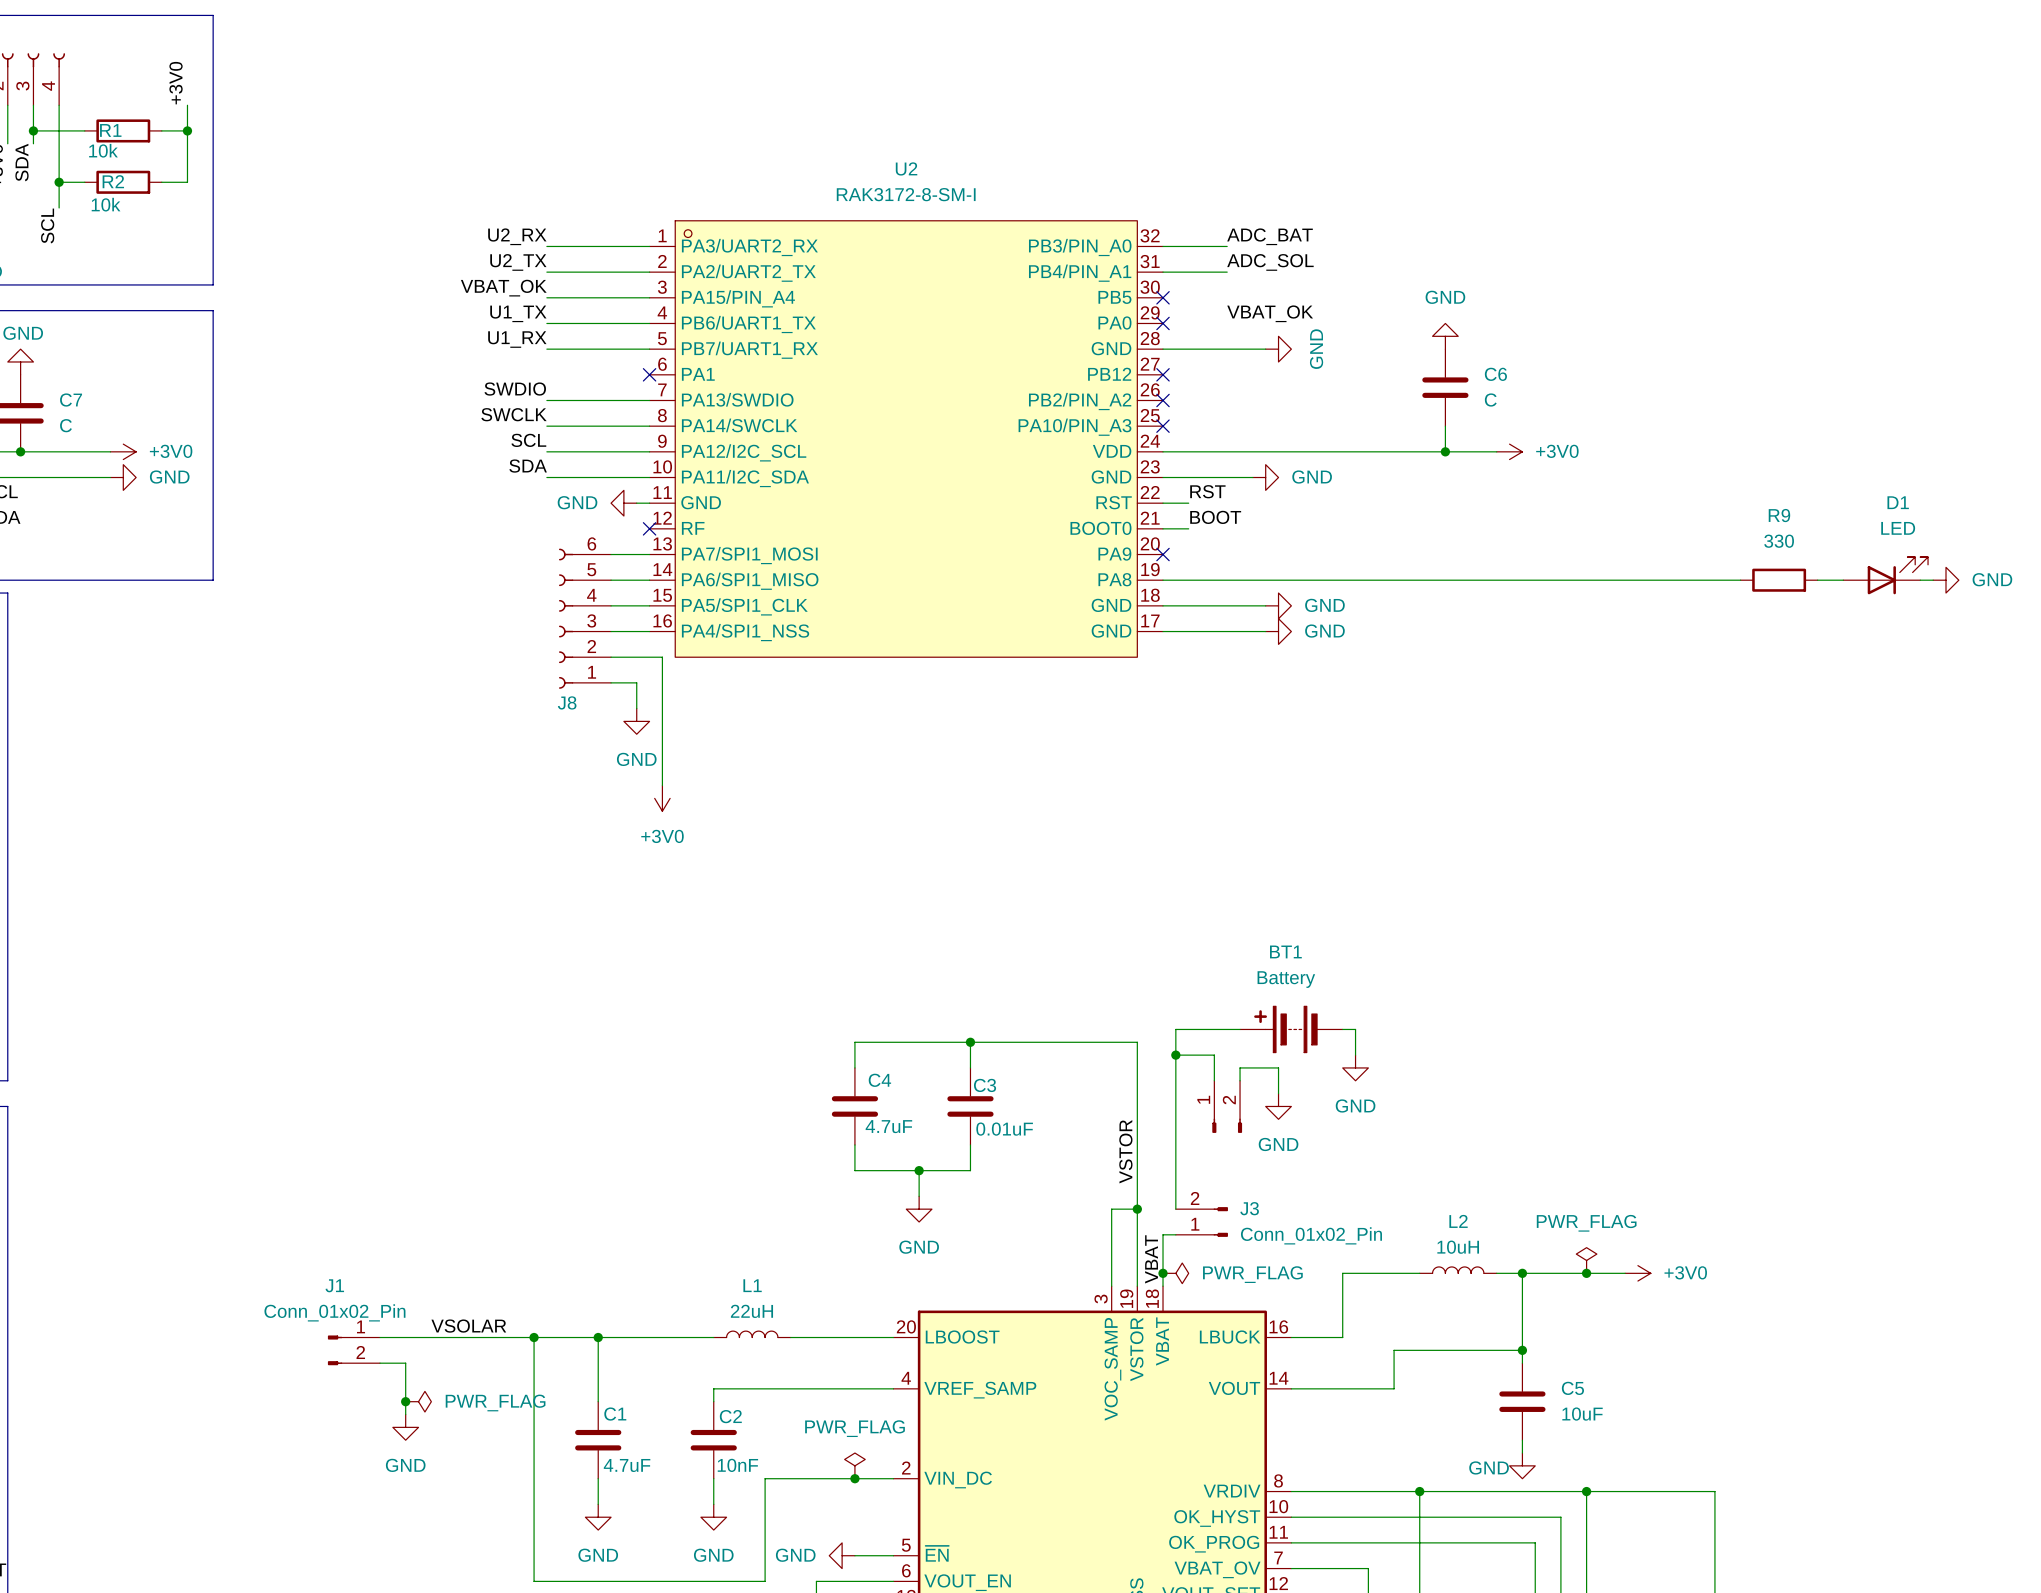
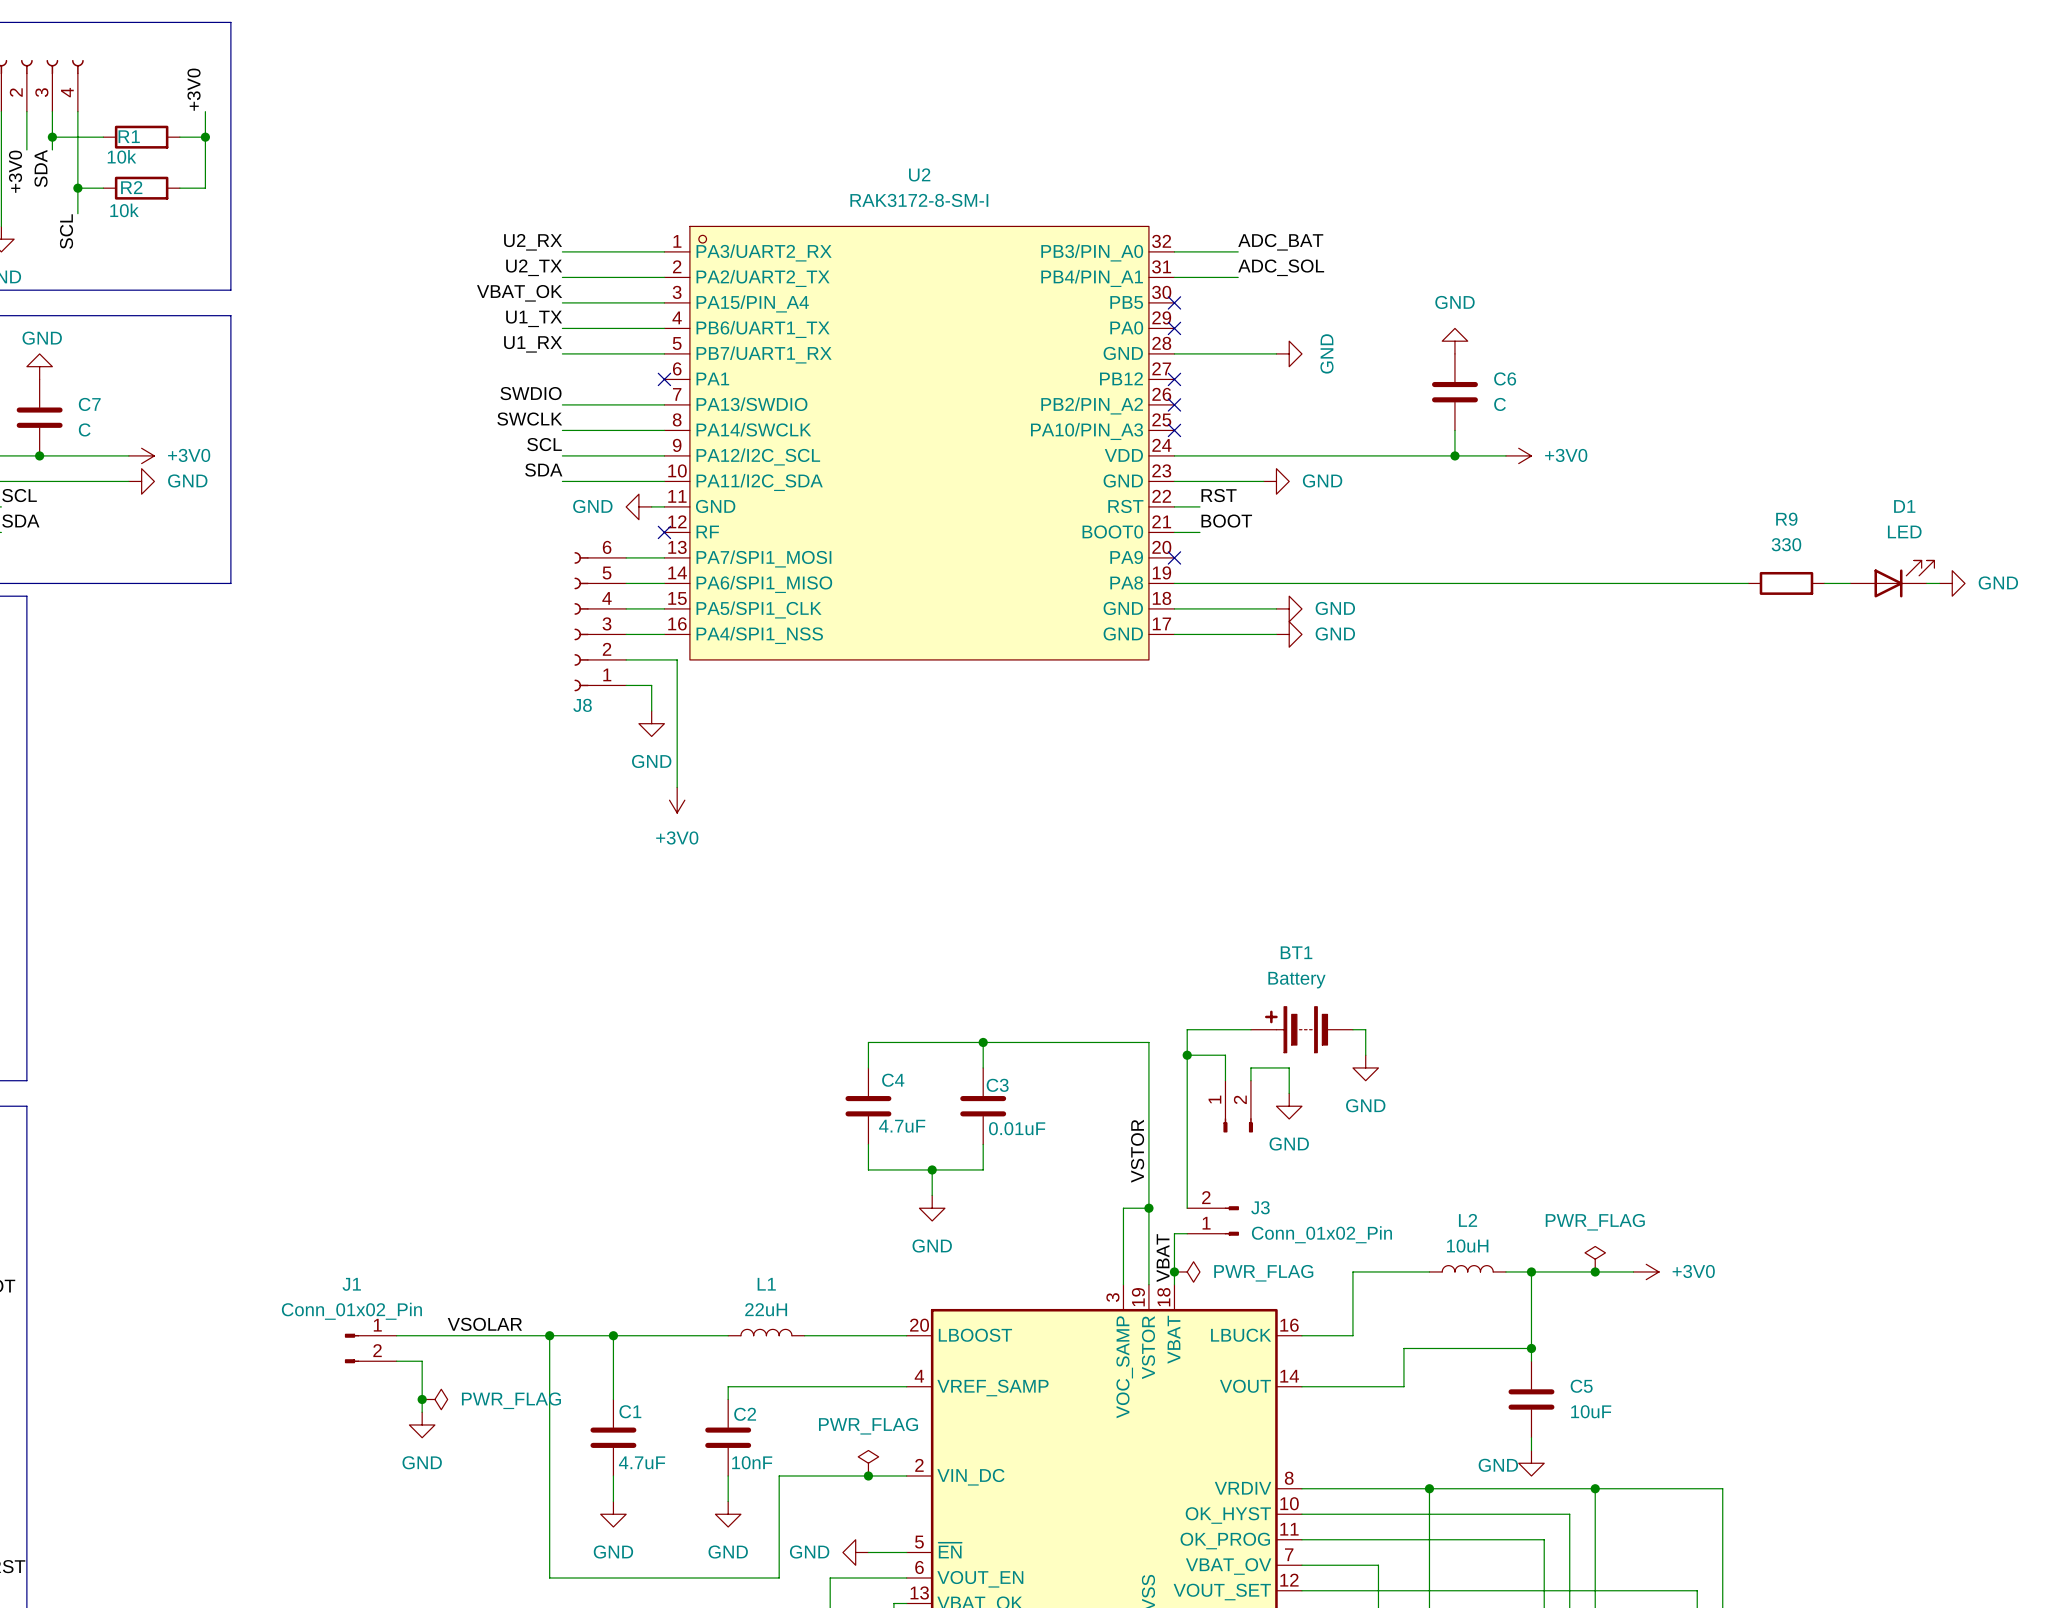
label: VBAT_OK (1270, 313) -> none

